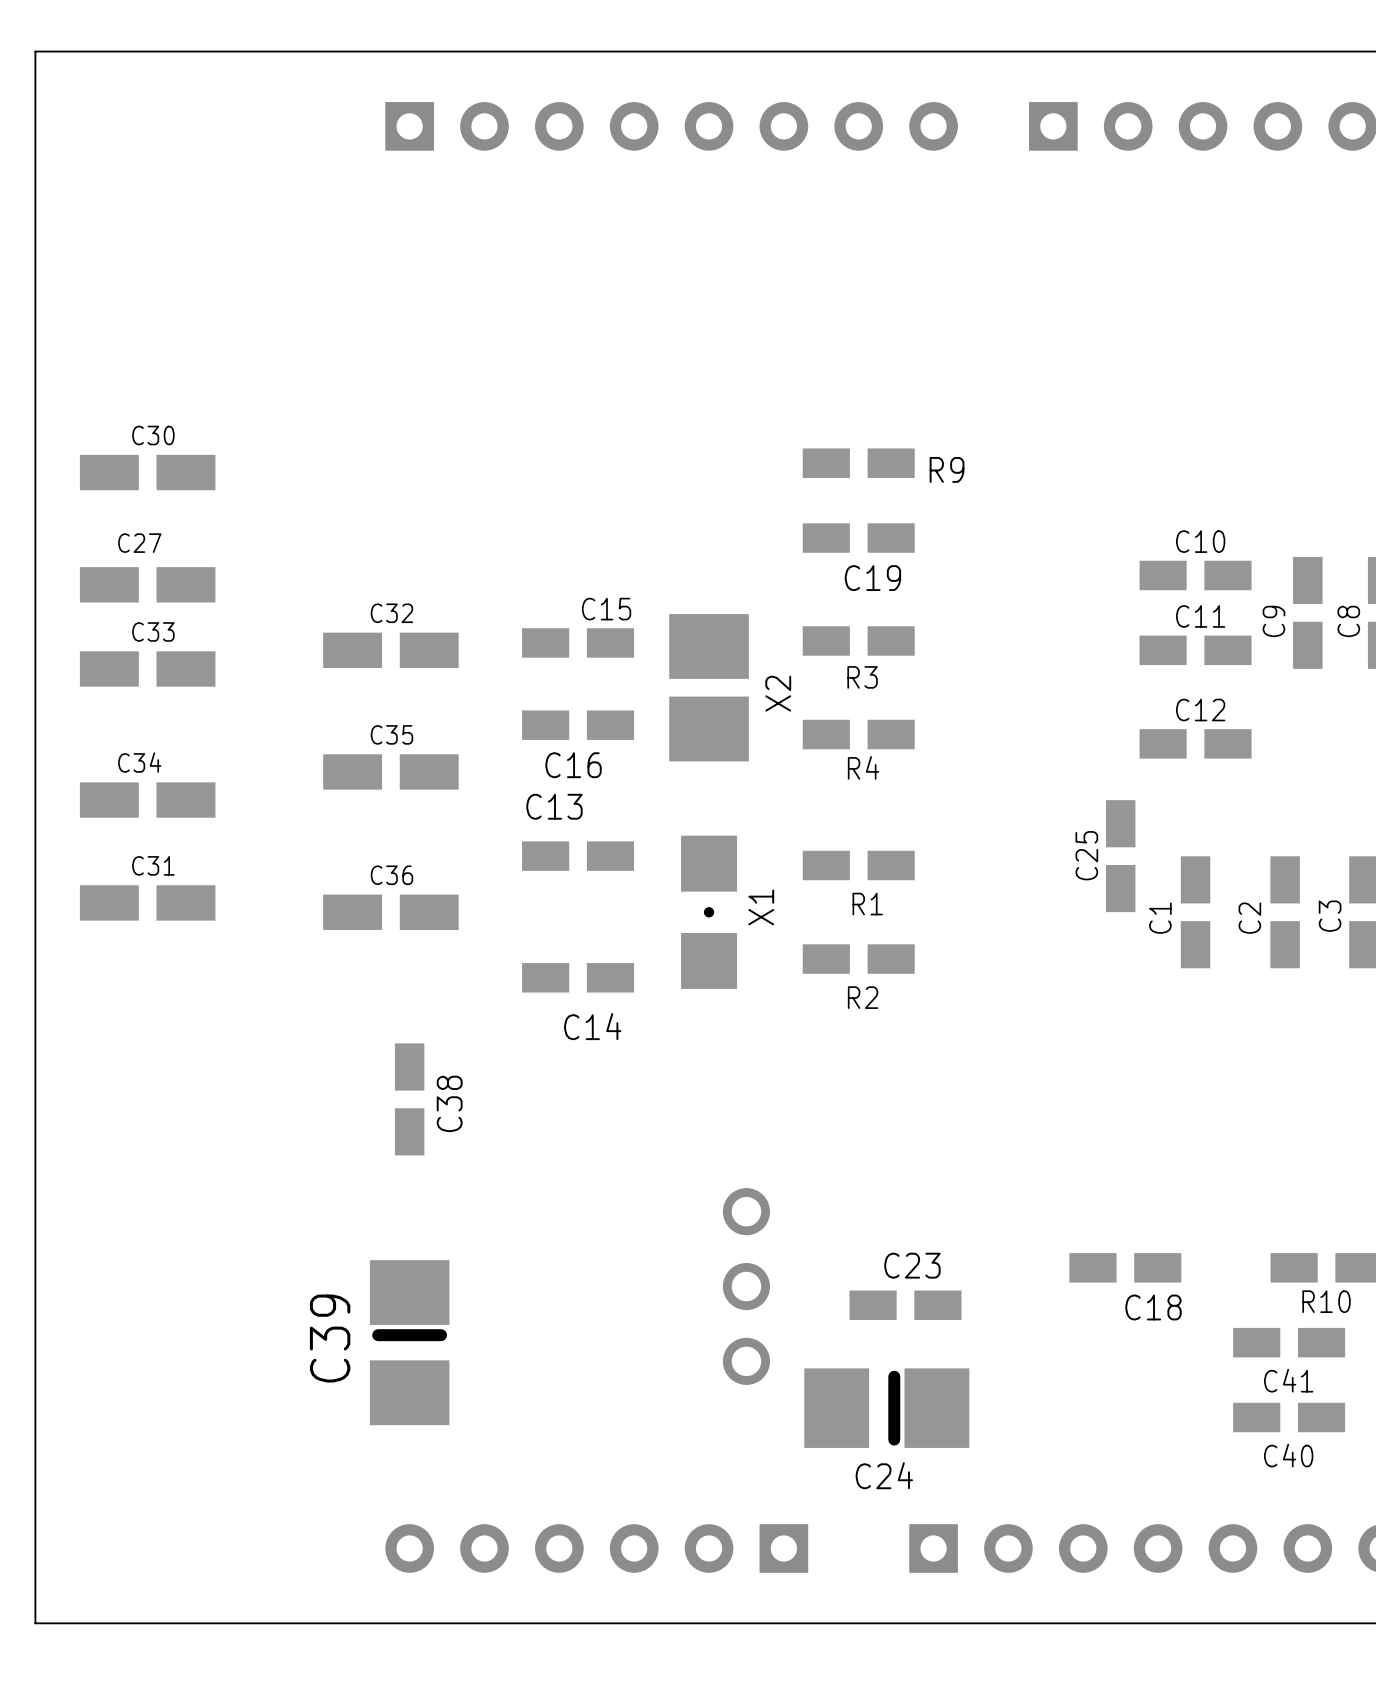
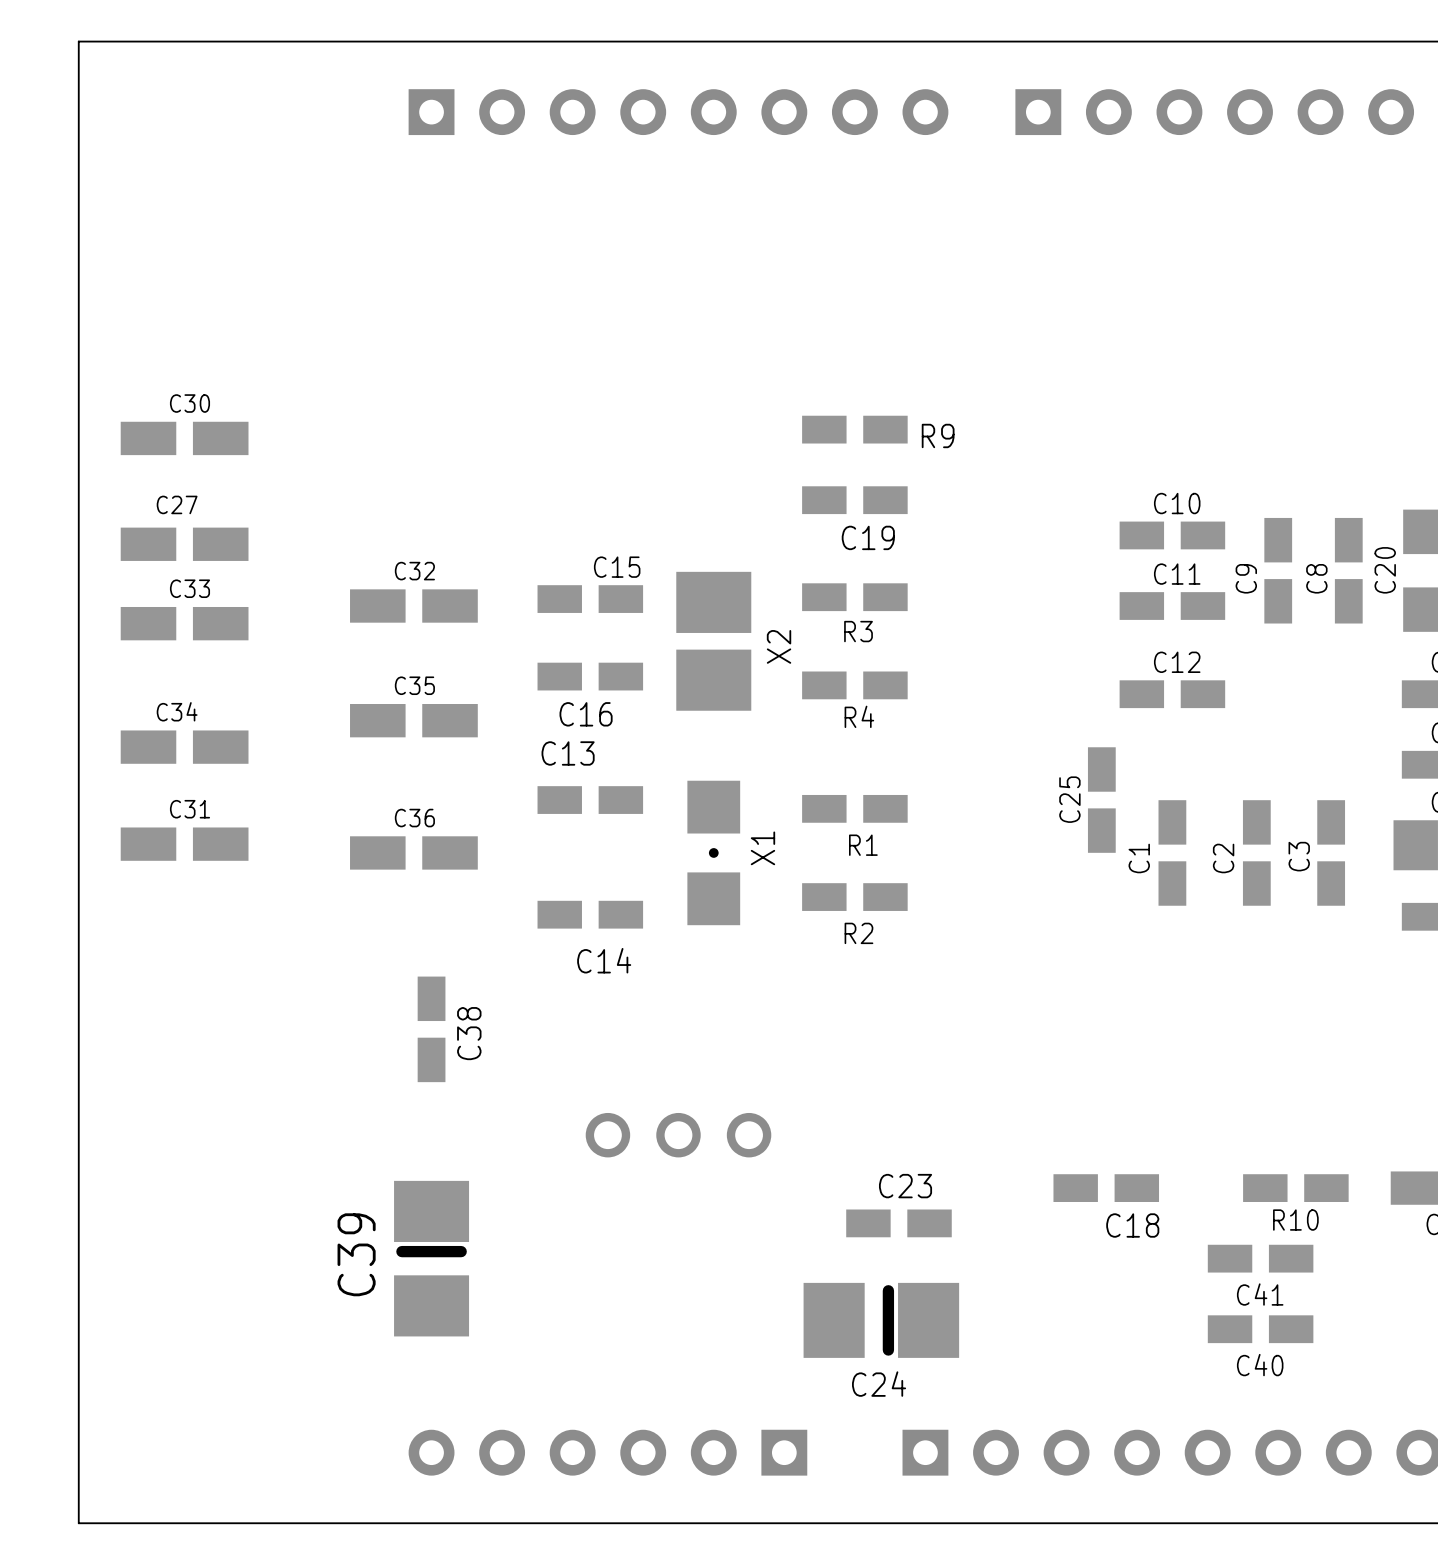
part rotation: 0° (746, 1286) -> 90° clockwise (678, 1135)

